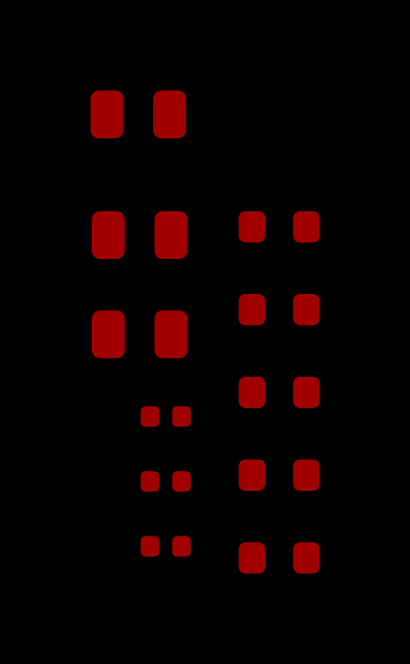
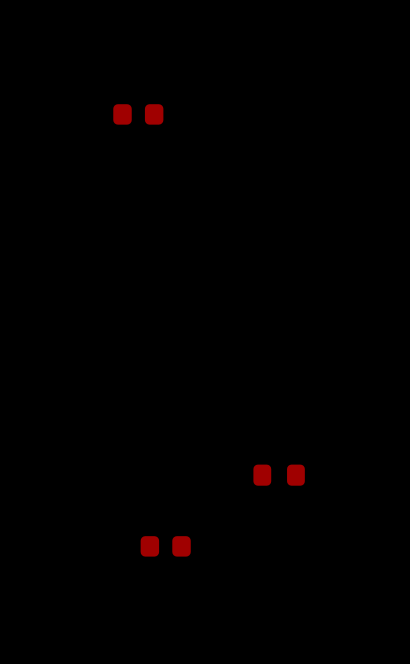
part footprint: [90, 90, 187, 139] -> [113, 104, 164, 125]
part: (279, 226) -> none
part: (139, 235) -> none
part: (279, 309) -> none
part: (139, 334) -> none
part: (279, 392) -> none
part: (165, 416) -> none
part footprint: [238, 459, 320, 491] -> [253, 464, 305, 486]
part: (165, 481) -> none
part: (279, 557) -> none

